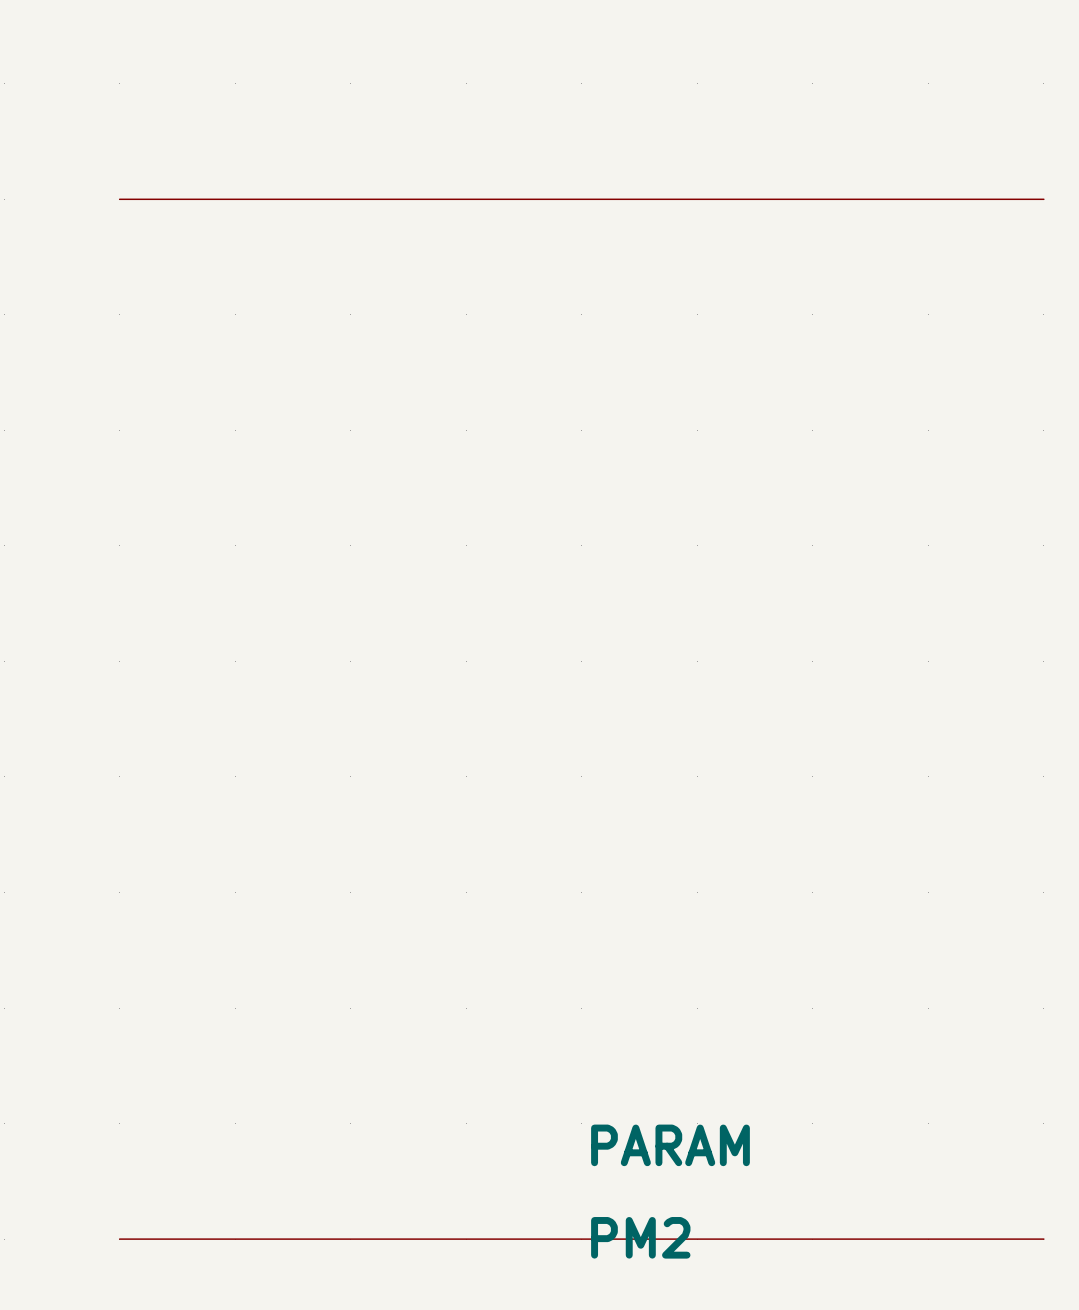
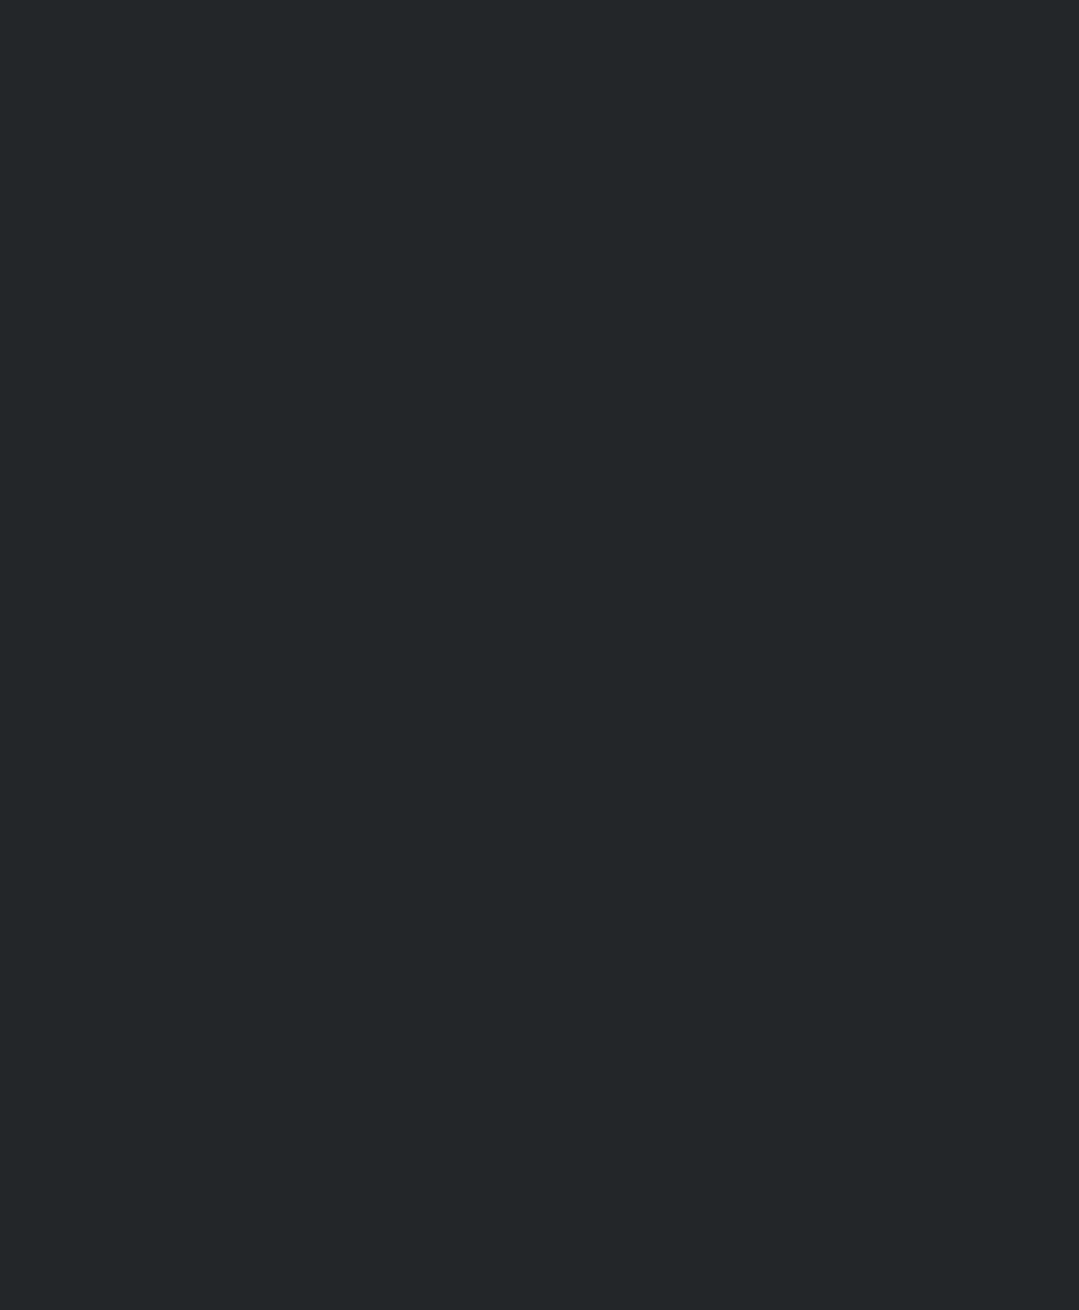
part: (581, 199) -> none
PM2: PARAM (581, 1239) -> none

